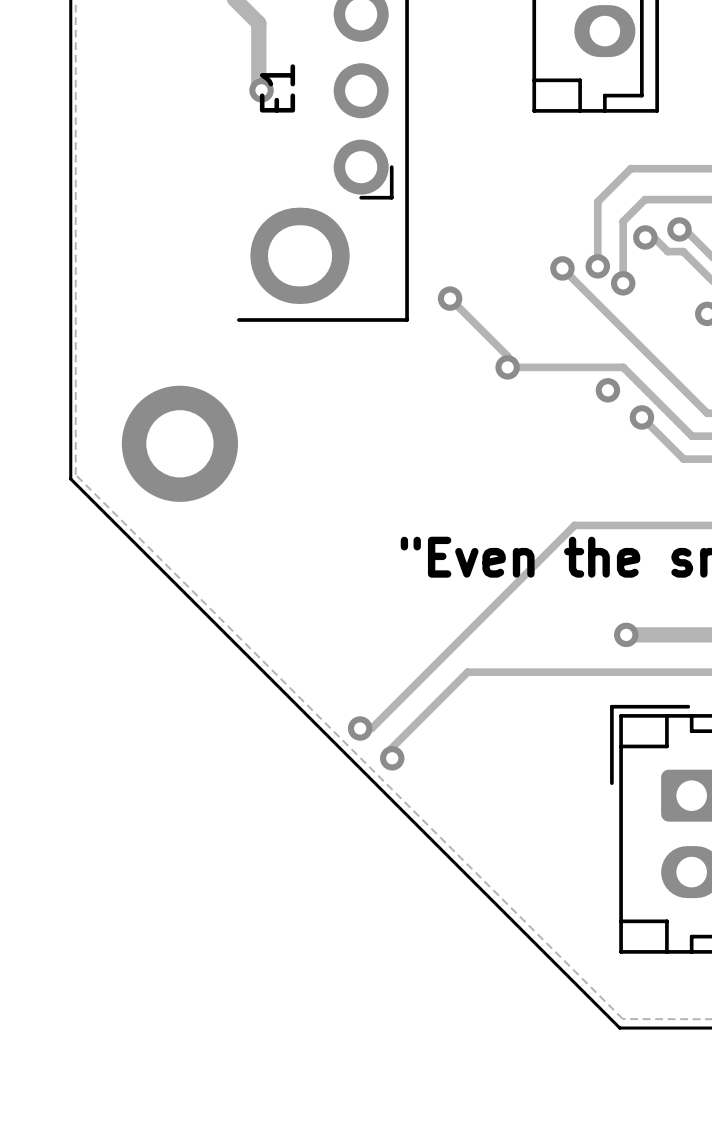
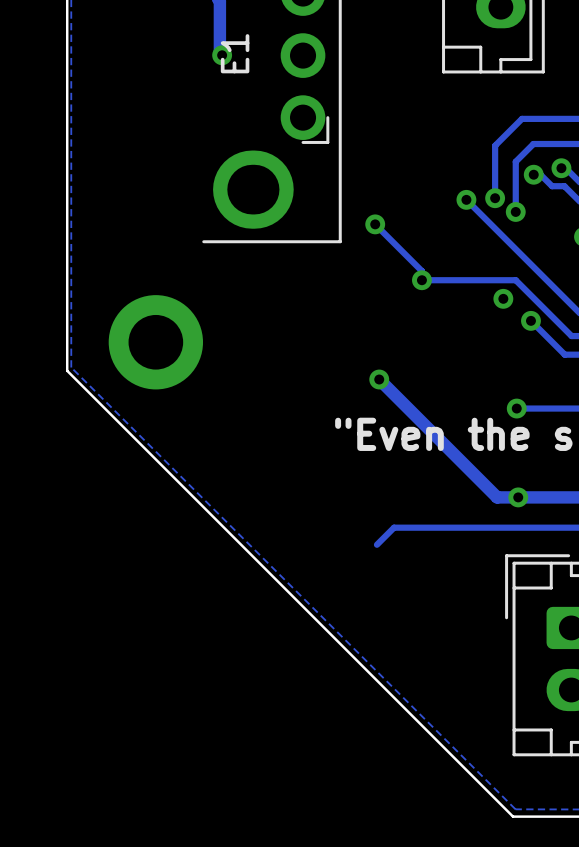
track: none -> (379, 379) (497, 497) (518, 497)
via: none -> (379, 379)
track: (624, 525) (574, 525) (371, 728) (360, 728) -> none
via: none -> (516, 408)
track: (473, 672) (467, 672) (389, 749) (389, 756) (392, 758) -> (394, 527) (376, 544)
via: (360, 728) -> none
via: (392, 758) -> none

